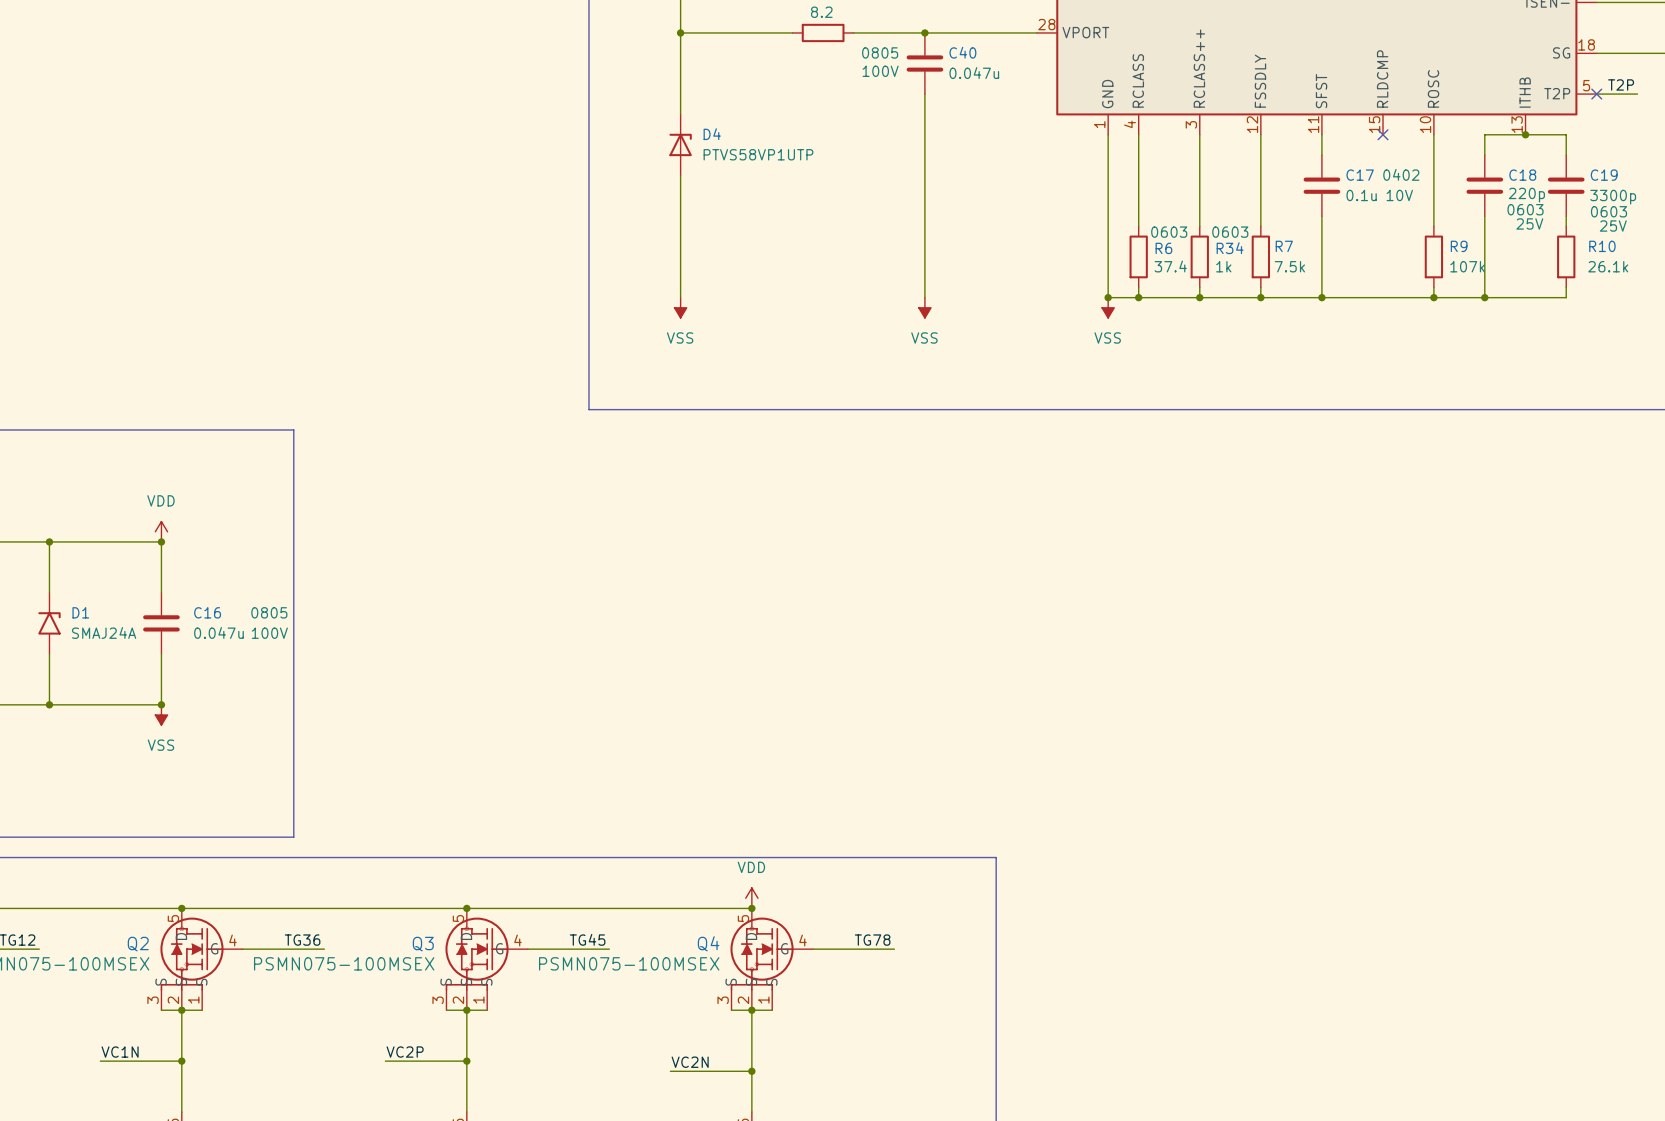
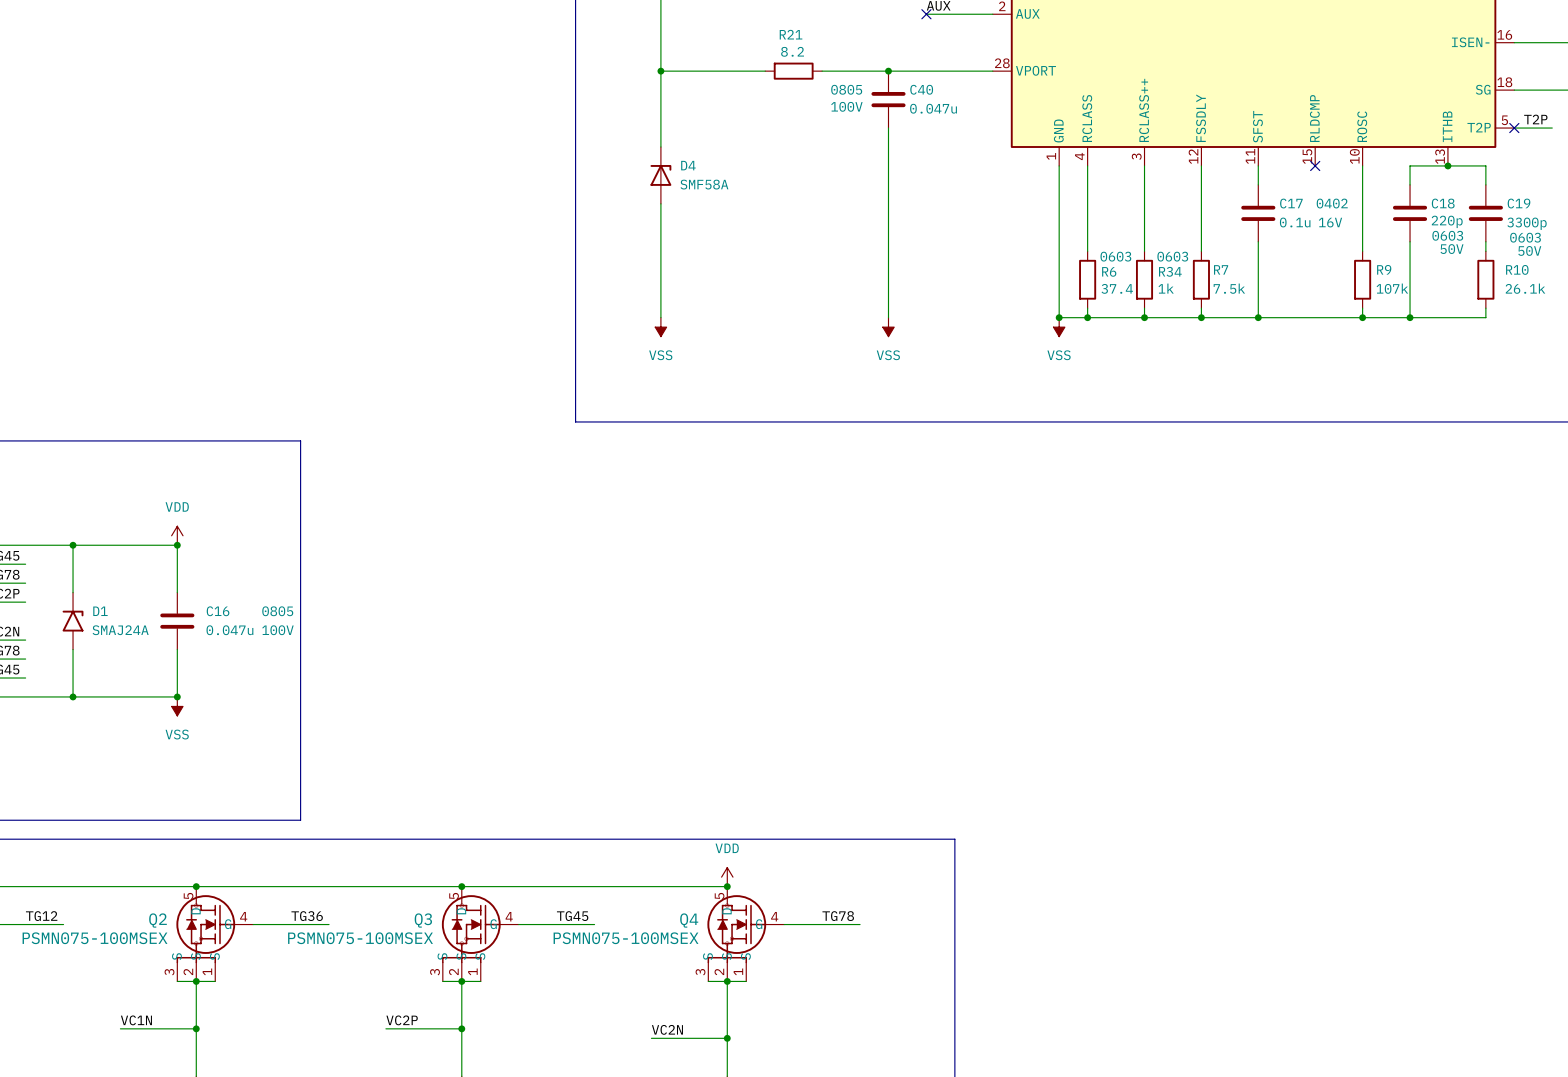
D4 value: PTVS58VP1UTP (758, 154) -> SMF58A (704, 184)
C17 text: 10V (1399, 195) -> 16V (1330, 222)
C18 text: 25V (1529, 223) -> 50V (1451, 249)
C19 text: 25V (1613, 226) -> 50V (1529, 250)

